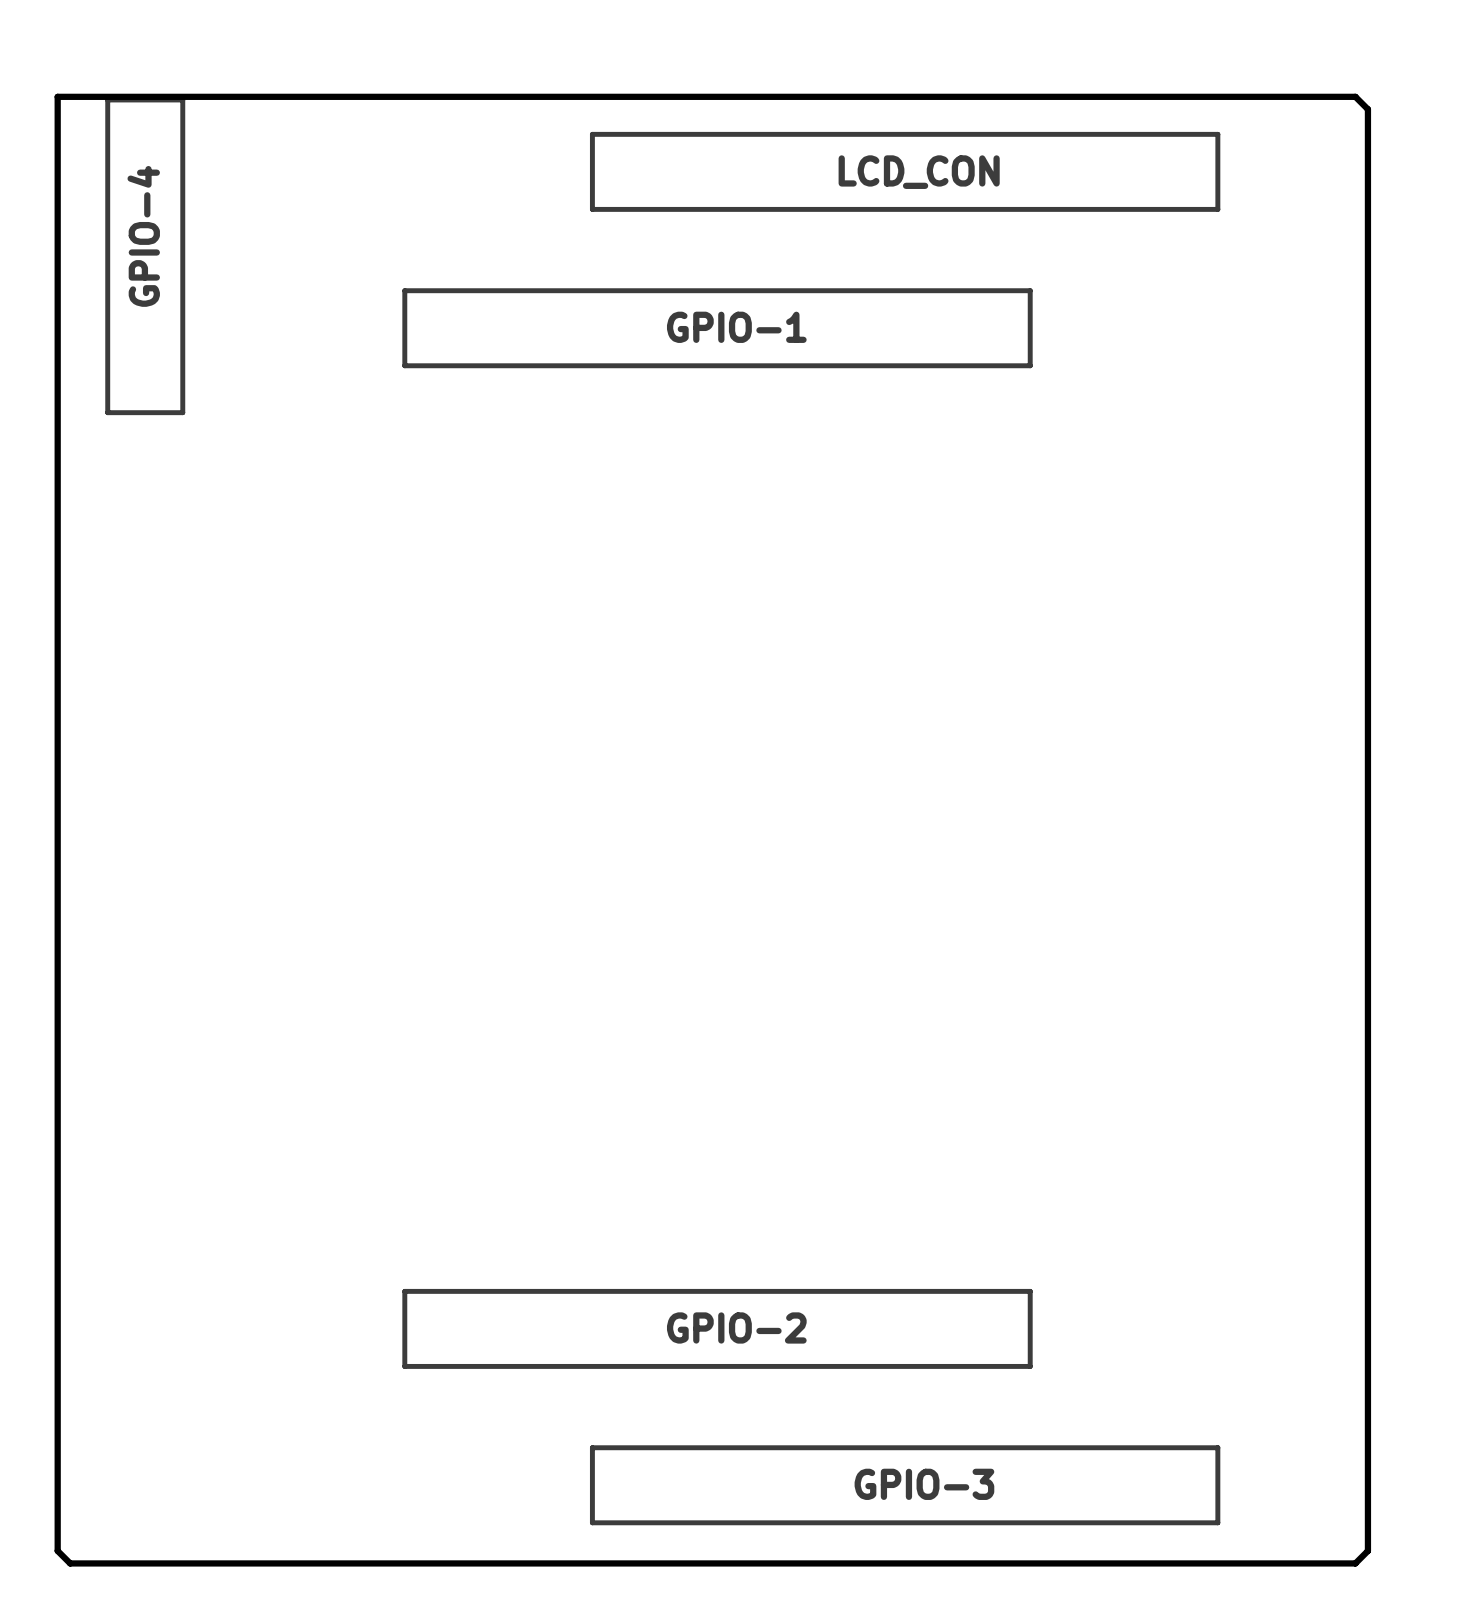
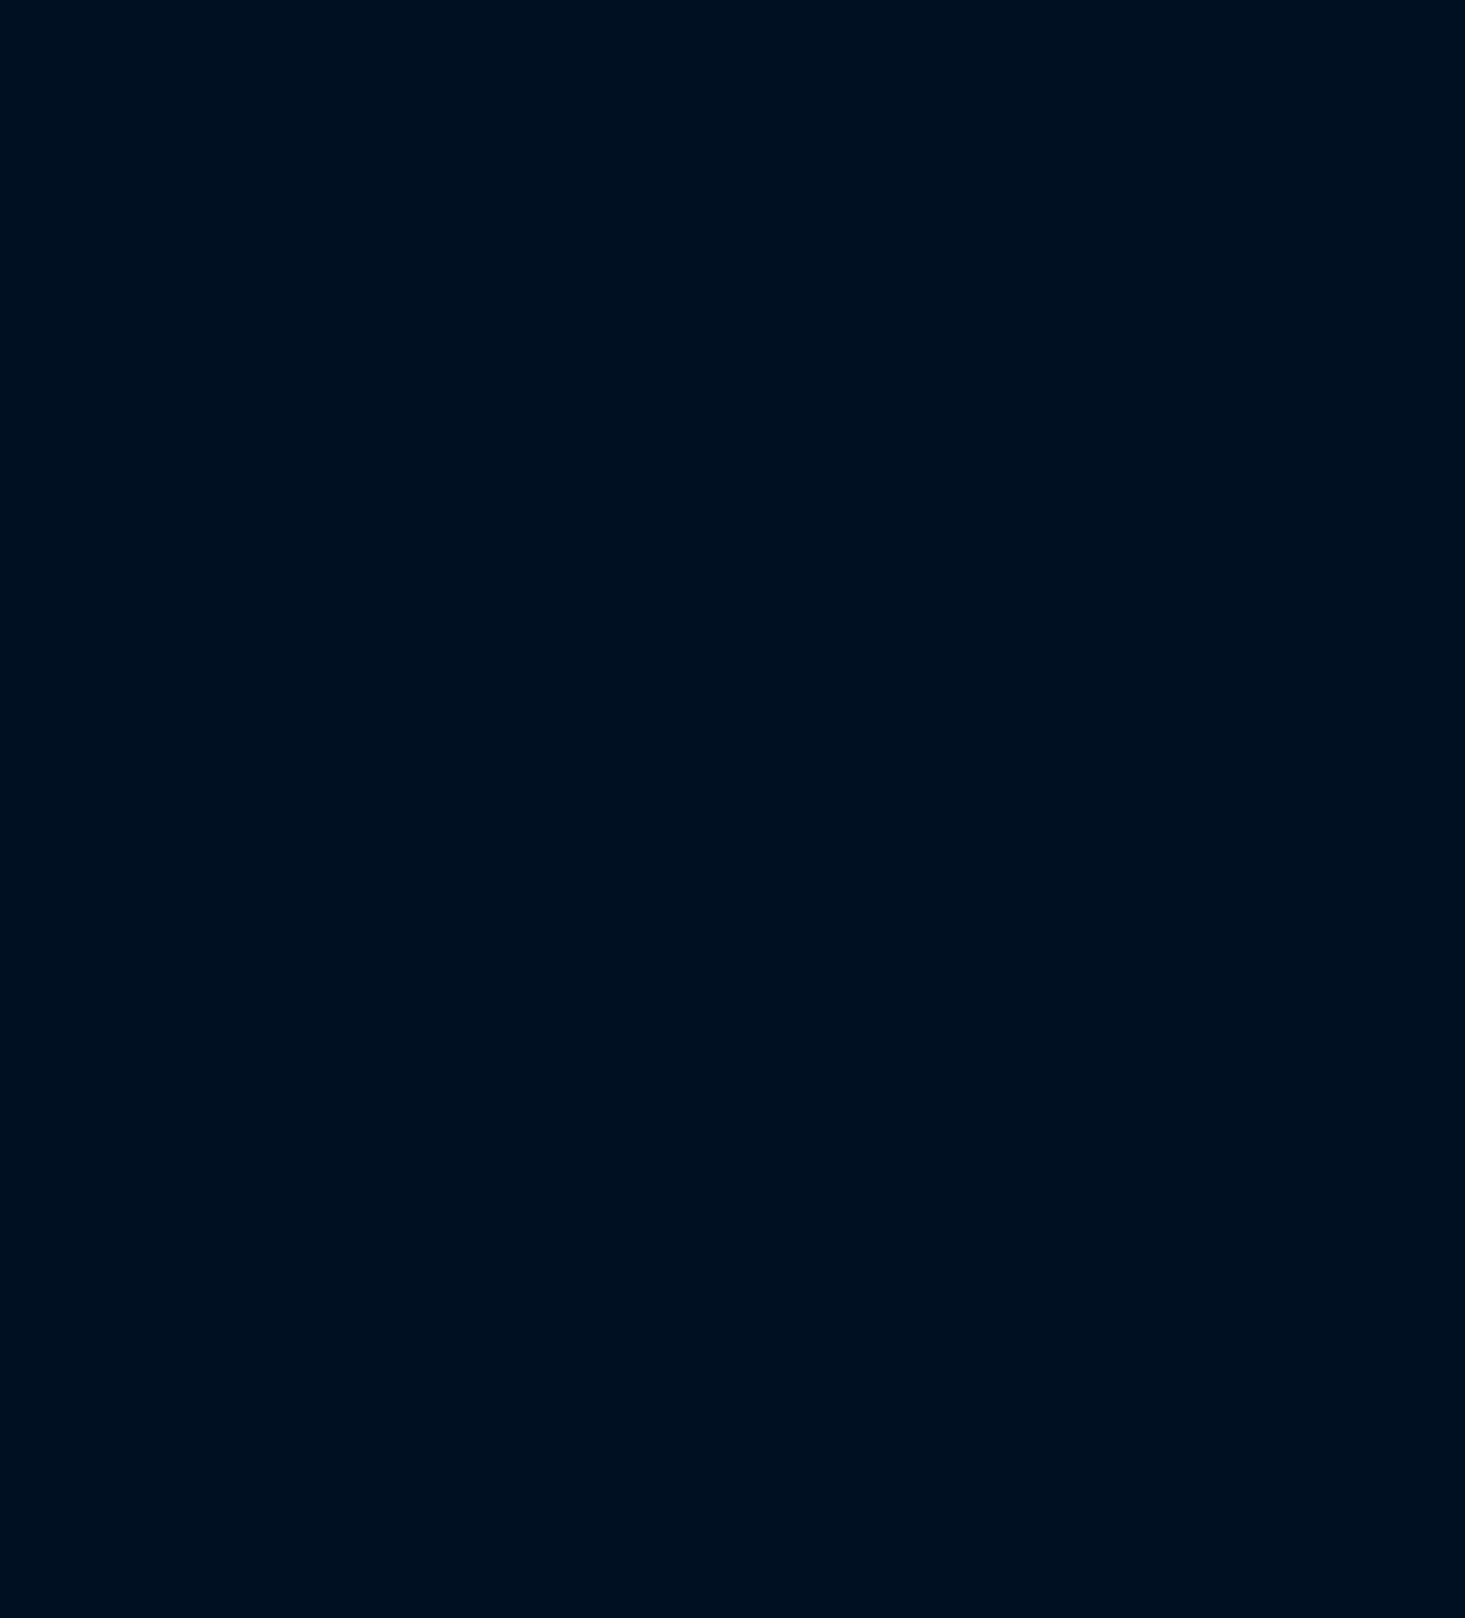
board edge: (57, 96) (1355, 96) (1367, 109) (1367, 1550) (1355, 1563) (70, 1563) (57, 1550) (57, 96) -> none
line: (107, 99) (107, 412) (182, 412) (182, 99) (107, 99) -> none
line: (592, 134) (592, 209) (1217, 209) (1217, 134) (592, 134) -> none
text: LCD_CON (919, 172) -> none
text: GPIO-4 (143, 236) -> none
line: (404, 290) (404, 365) (1030, 365) (1030, 290) (404, 290) -> none
text: GPIO-1 (736, 327) -> none
line: (404, 1291) (1030, 1291) (1030, 1366) (404, 1366) (404, 1291) -> none
text: GPIO-2 (736, 1327) -> none
line: (592, 1447) (1217, 1447) (1217, 1522) (592, 1522) (592, 1447) -> none
text: GPIO-3 (924, 1484) -> none

